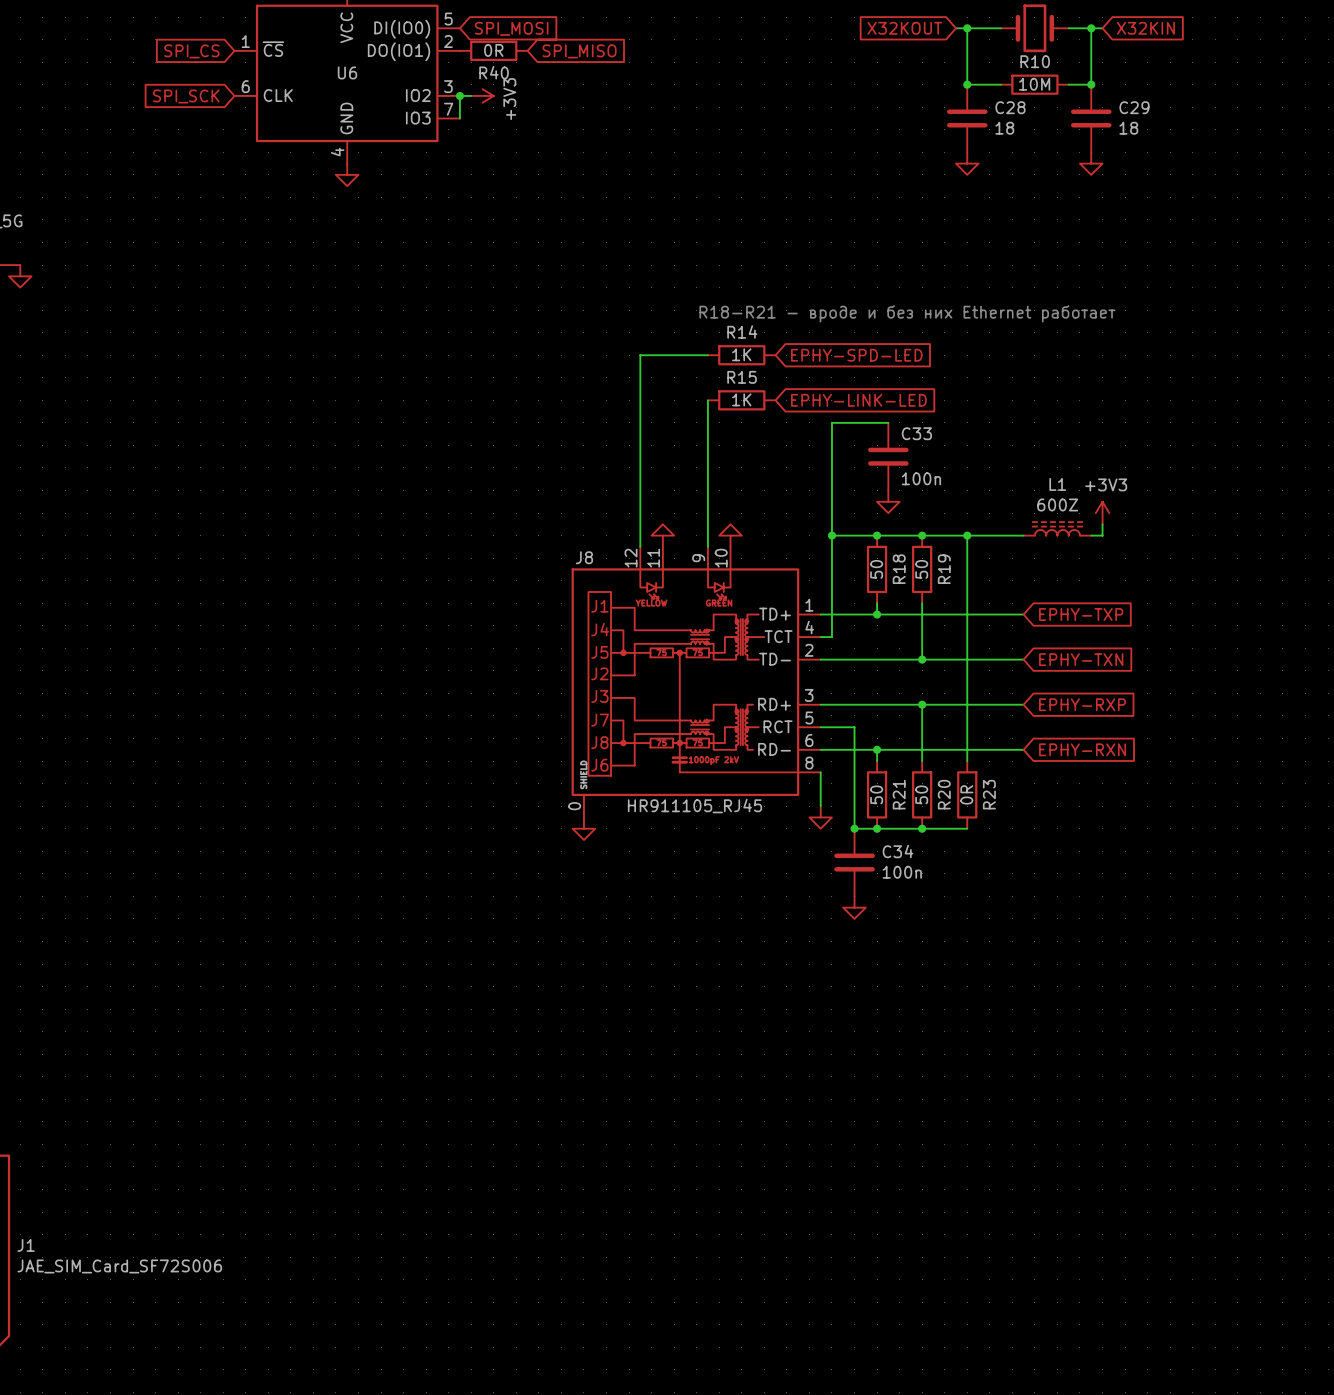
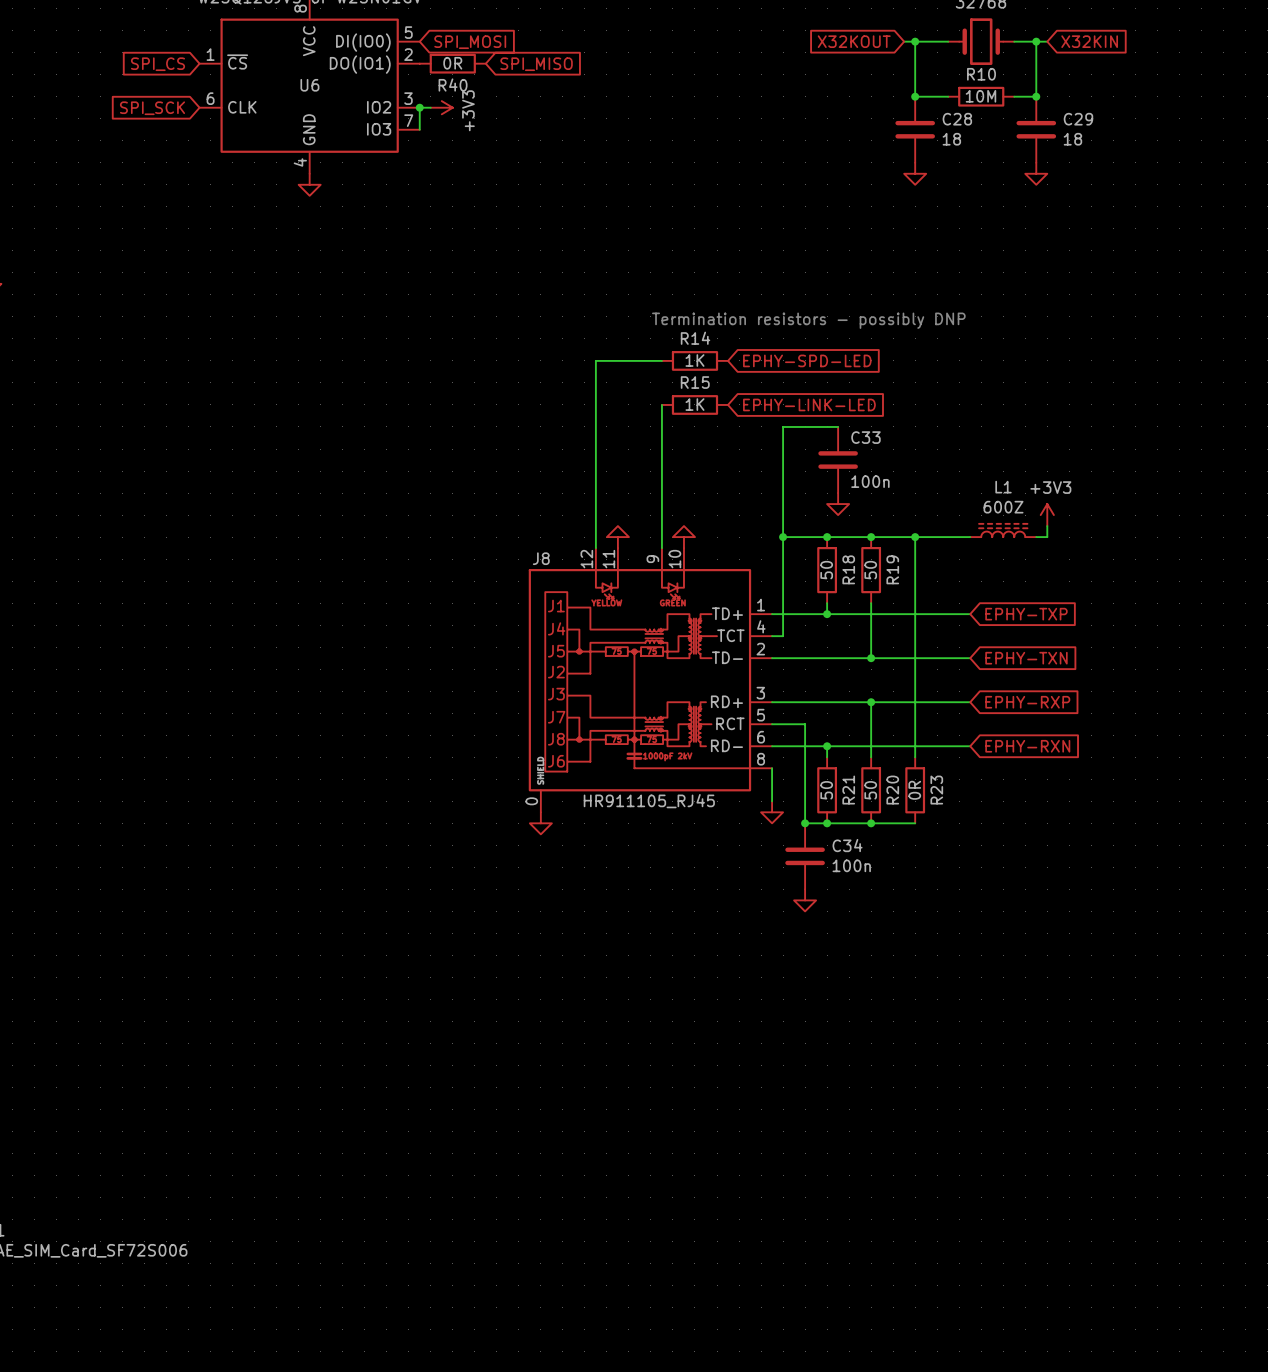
text: R18-R21 - вроде и без них Ethernet работает (907, 313) -> Termination resistors - possibly DNP (808, 320)

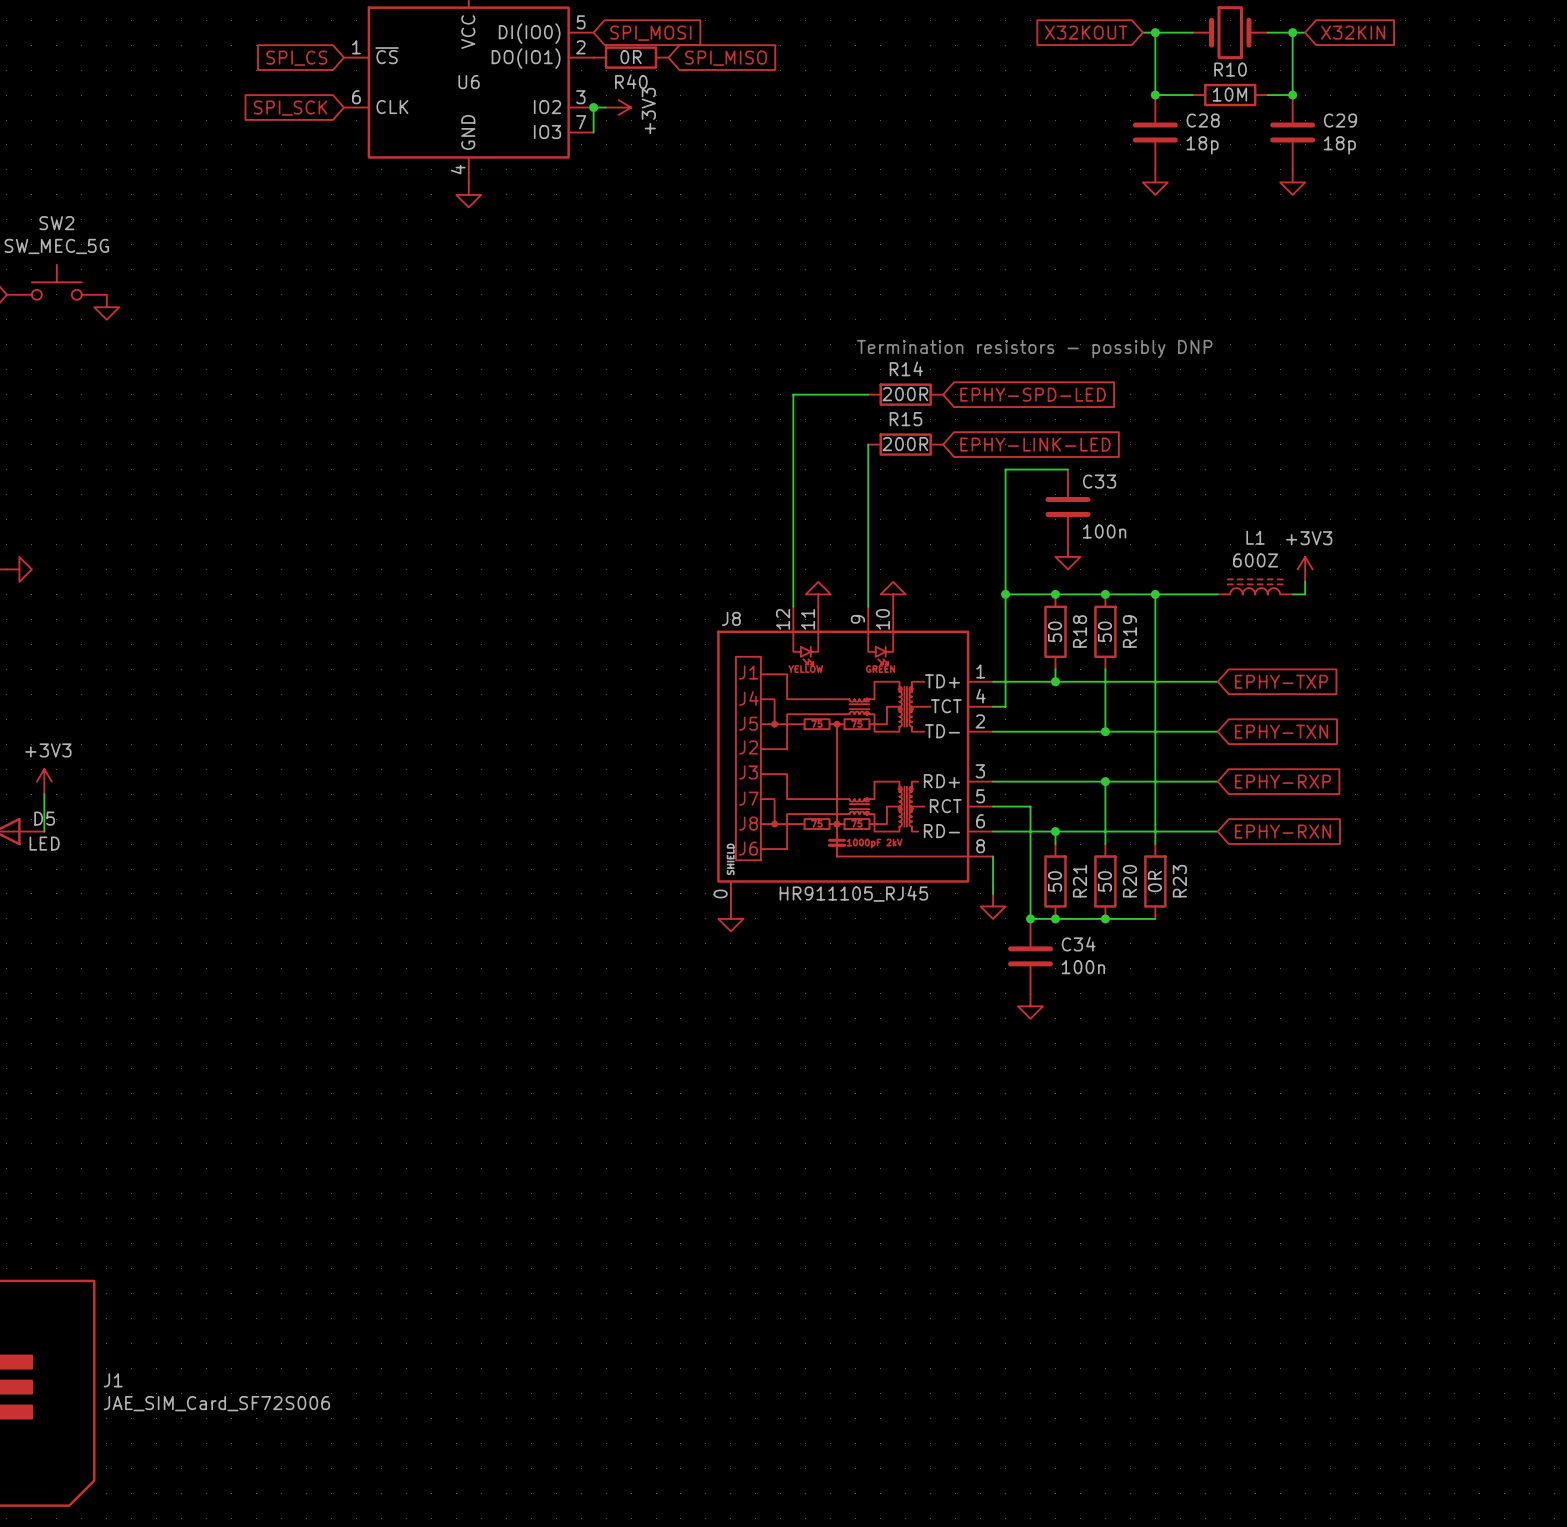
C28 value: 18 (951, 139) -> 18p (1202, 145)
C29 value: 18 (1072, 139) -> 18p (1339, 145)
R14 value: 1K (694, 360) -> 200R (905, 394)
R15 value: 1K (694, 404) -> 200R (905, 444)

